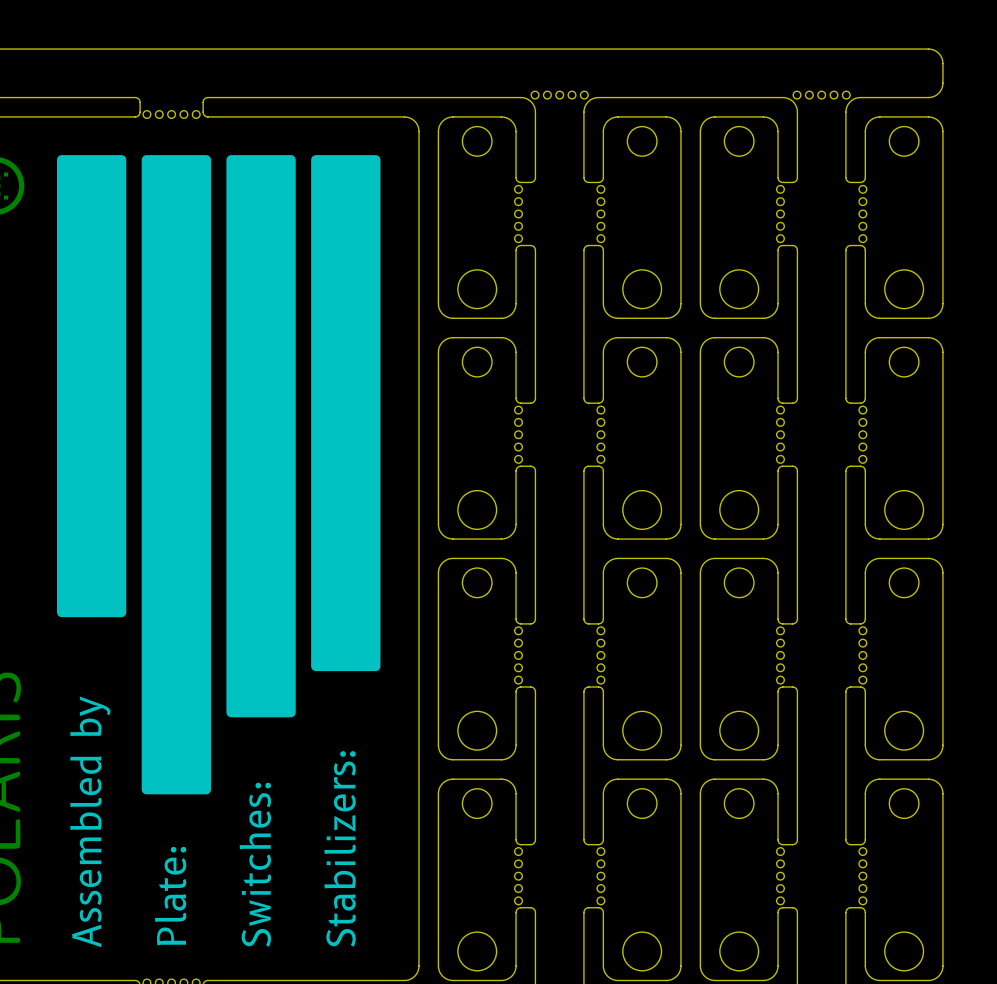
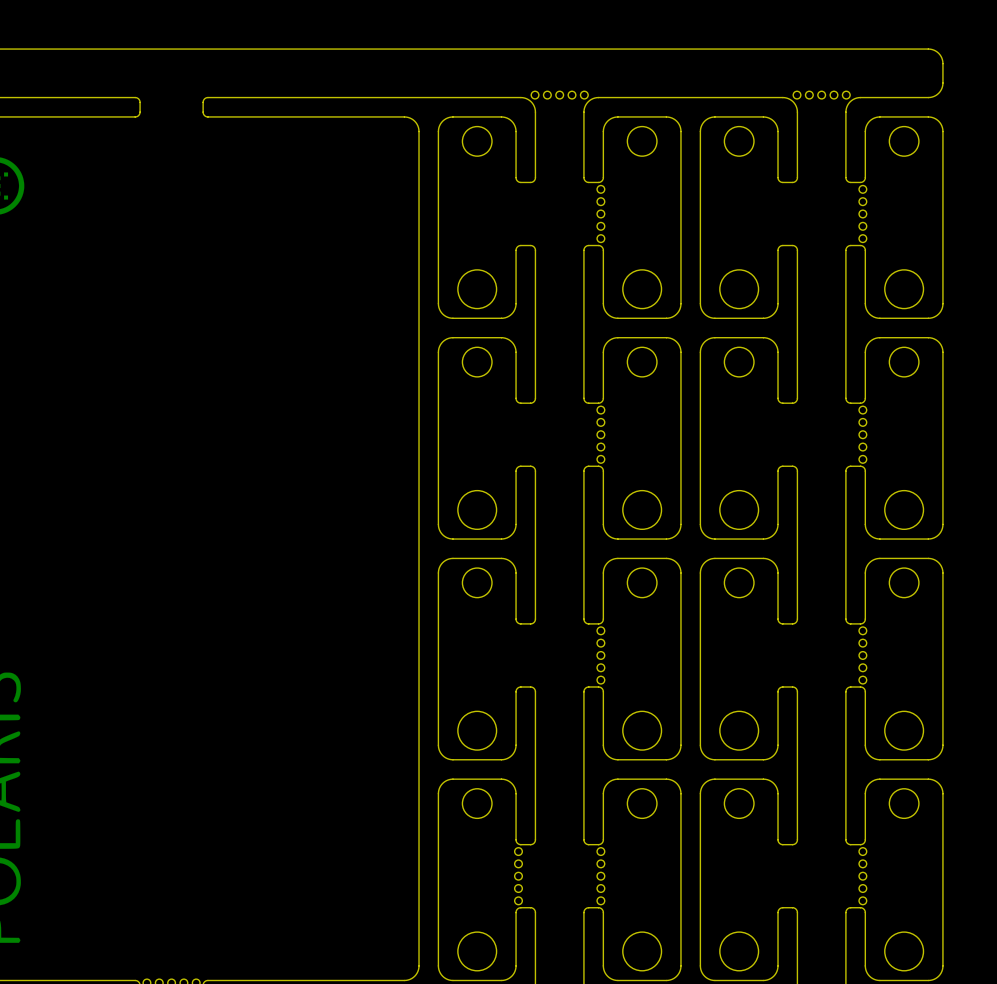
part: (171, 114) -> none
drawing: [56, 155, 127, 618] -> none
drawing: [141, 155, 212, 795] -> none
drawing: [226, 155, 296, 718] -> none
drawing: [311, 155, 381, 672] -> none
part: (518, 213) -> none
part: (780, 213) -> none
part: (518, 434) -> none
part: (780, 434) -> none
part: (518, 655) -> none
part: (780, 655) -> none
text: Assembled by (90, 821) -> none
text: Stabilizers: (340, 848) -> none
text: Switches: (255, 864) -> none
part: (780, 876) -> none
text: Plate: (170, 896) -> none

